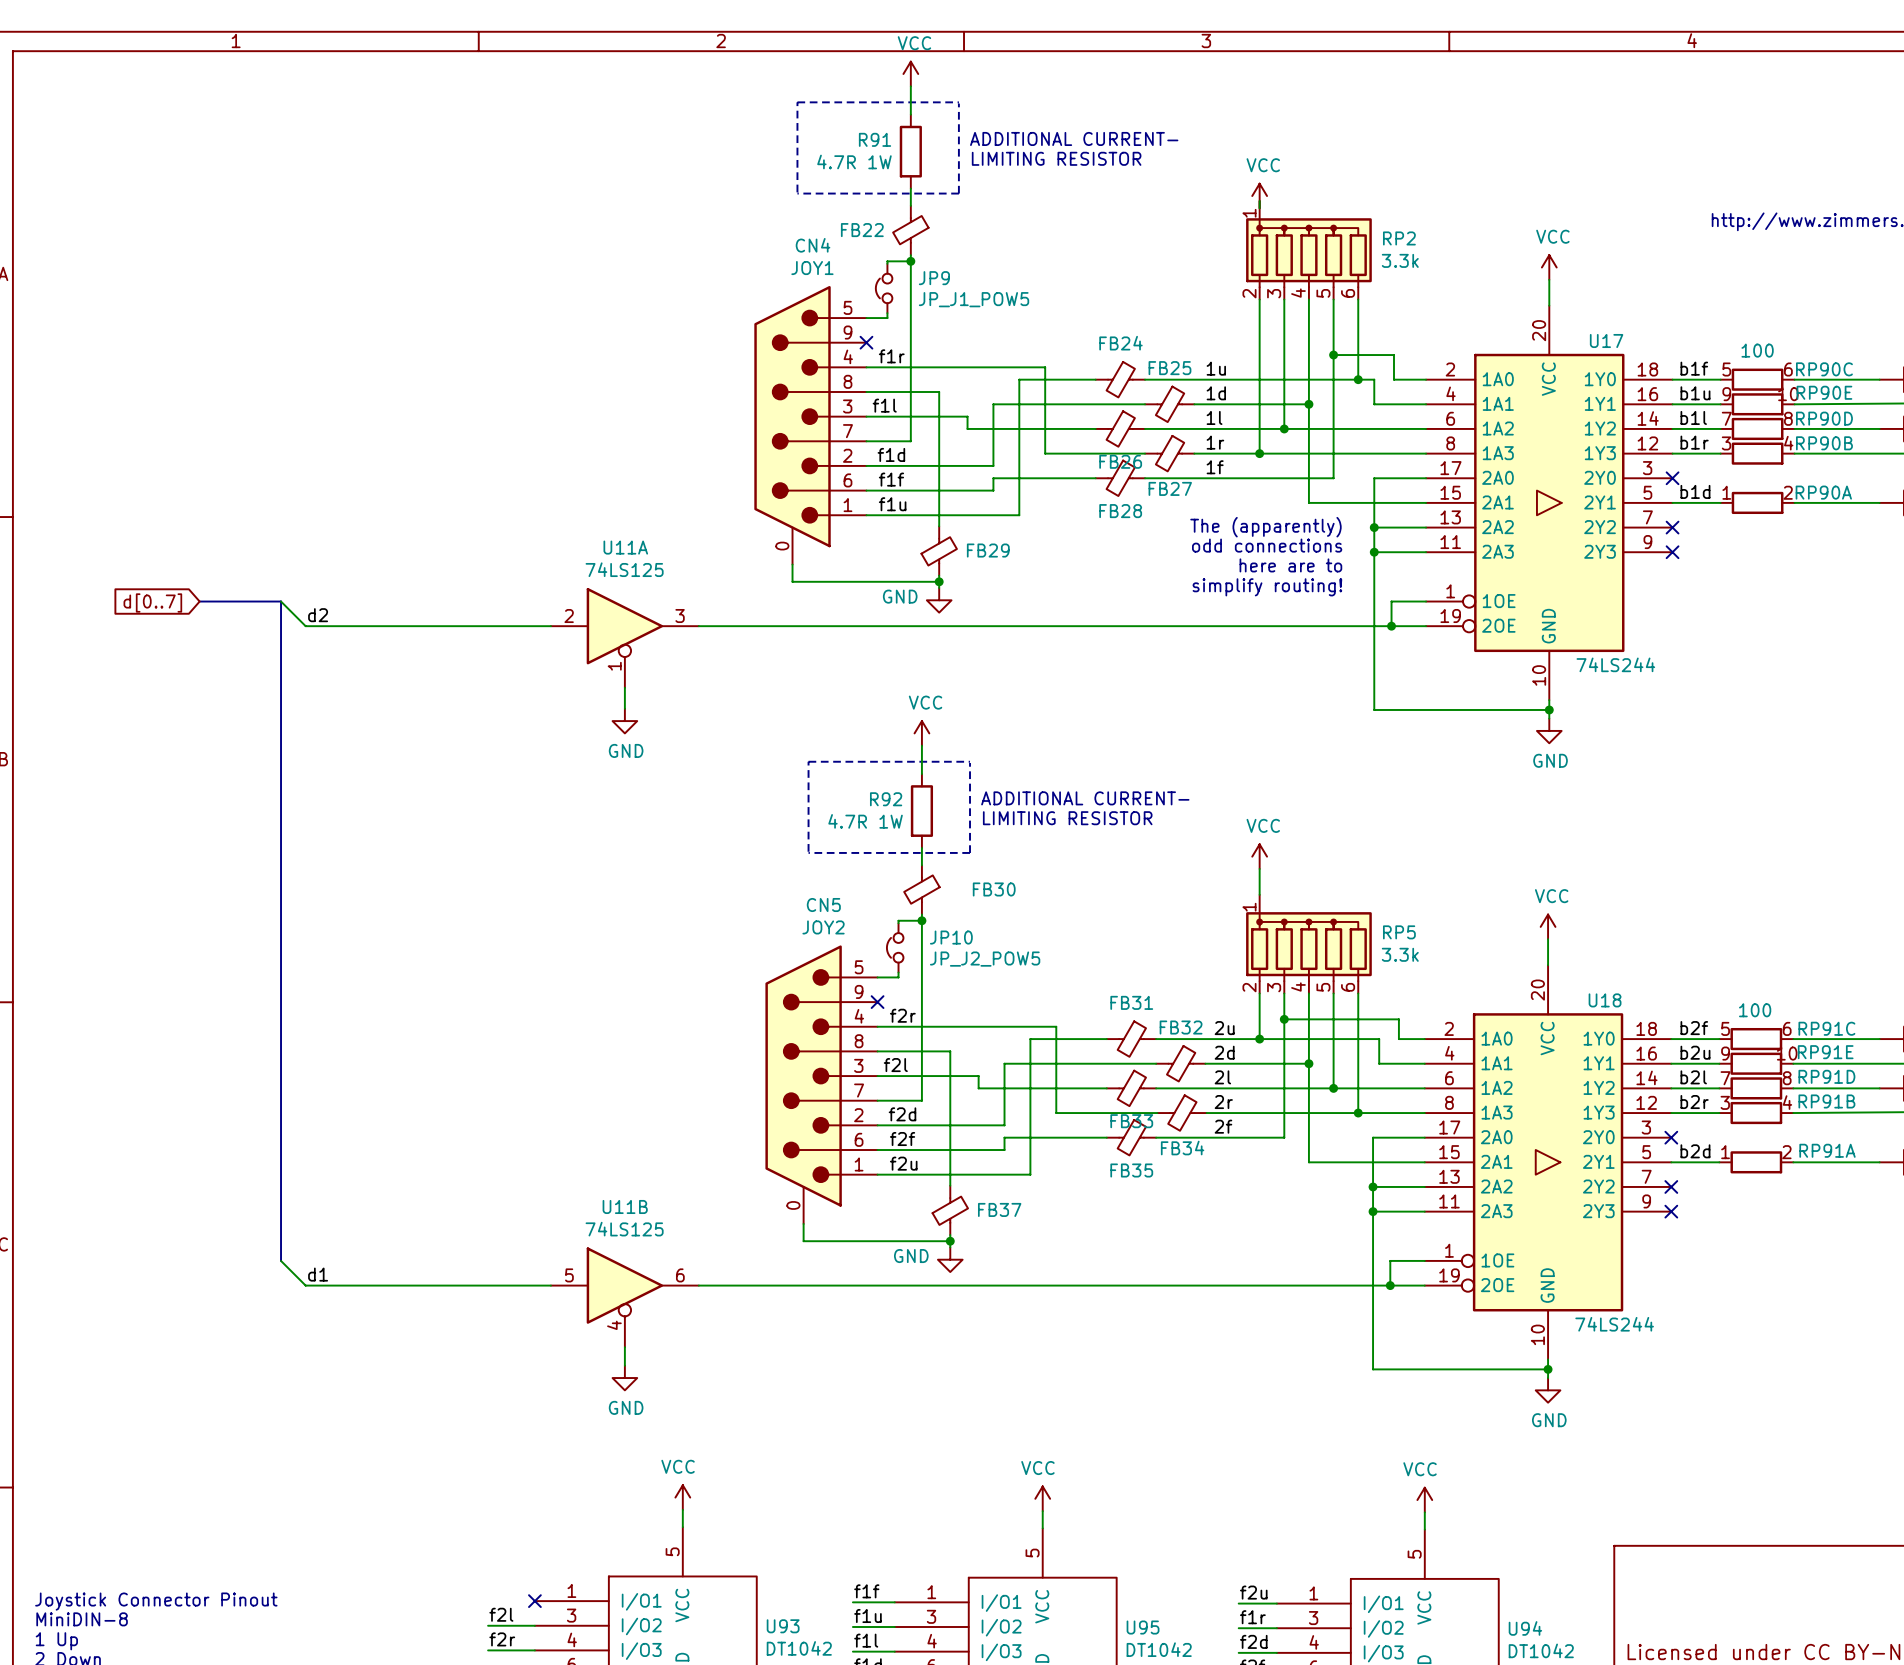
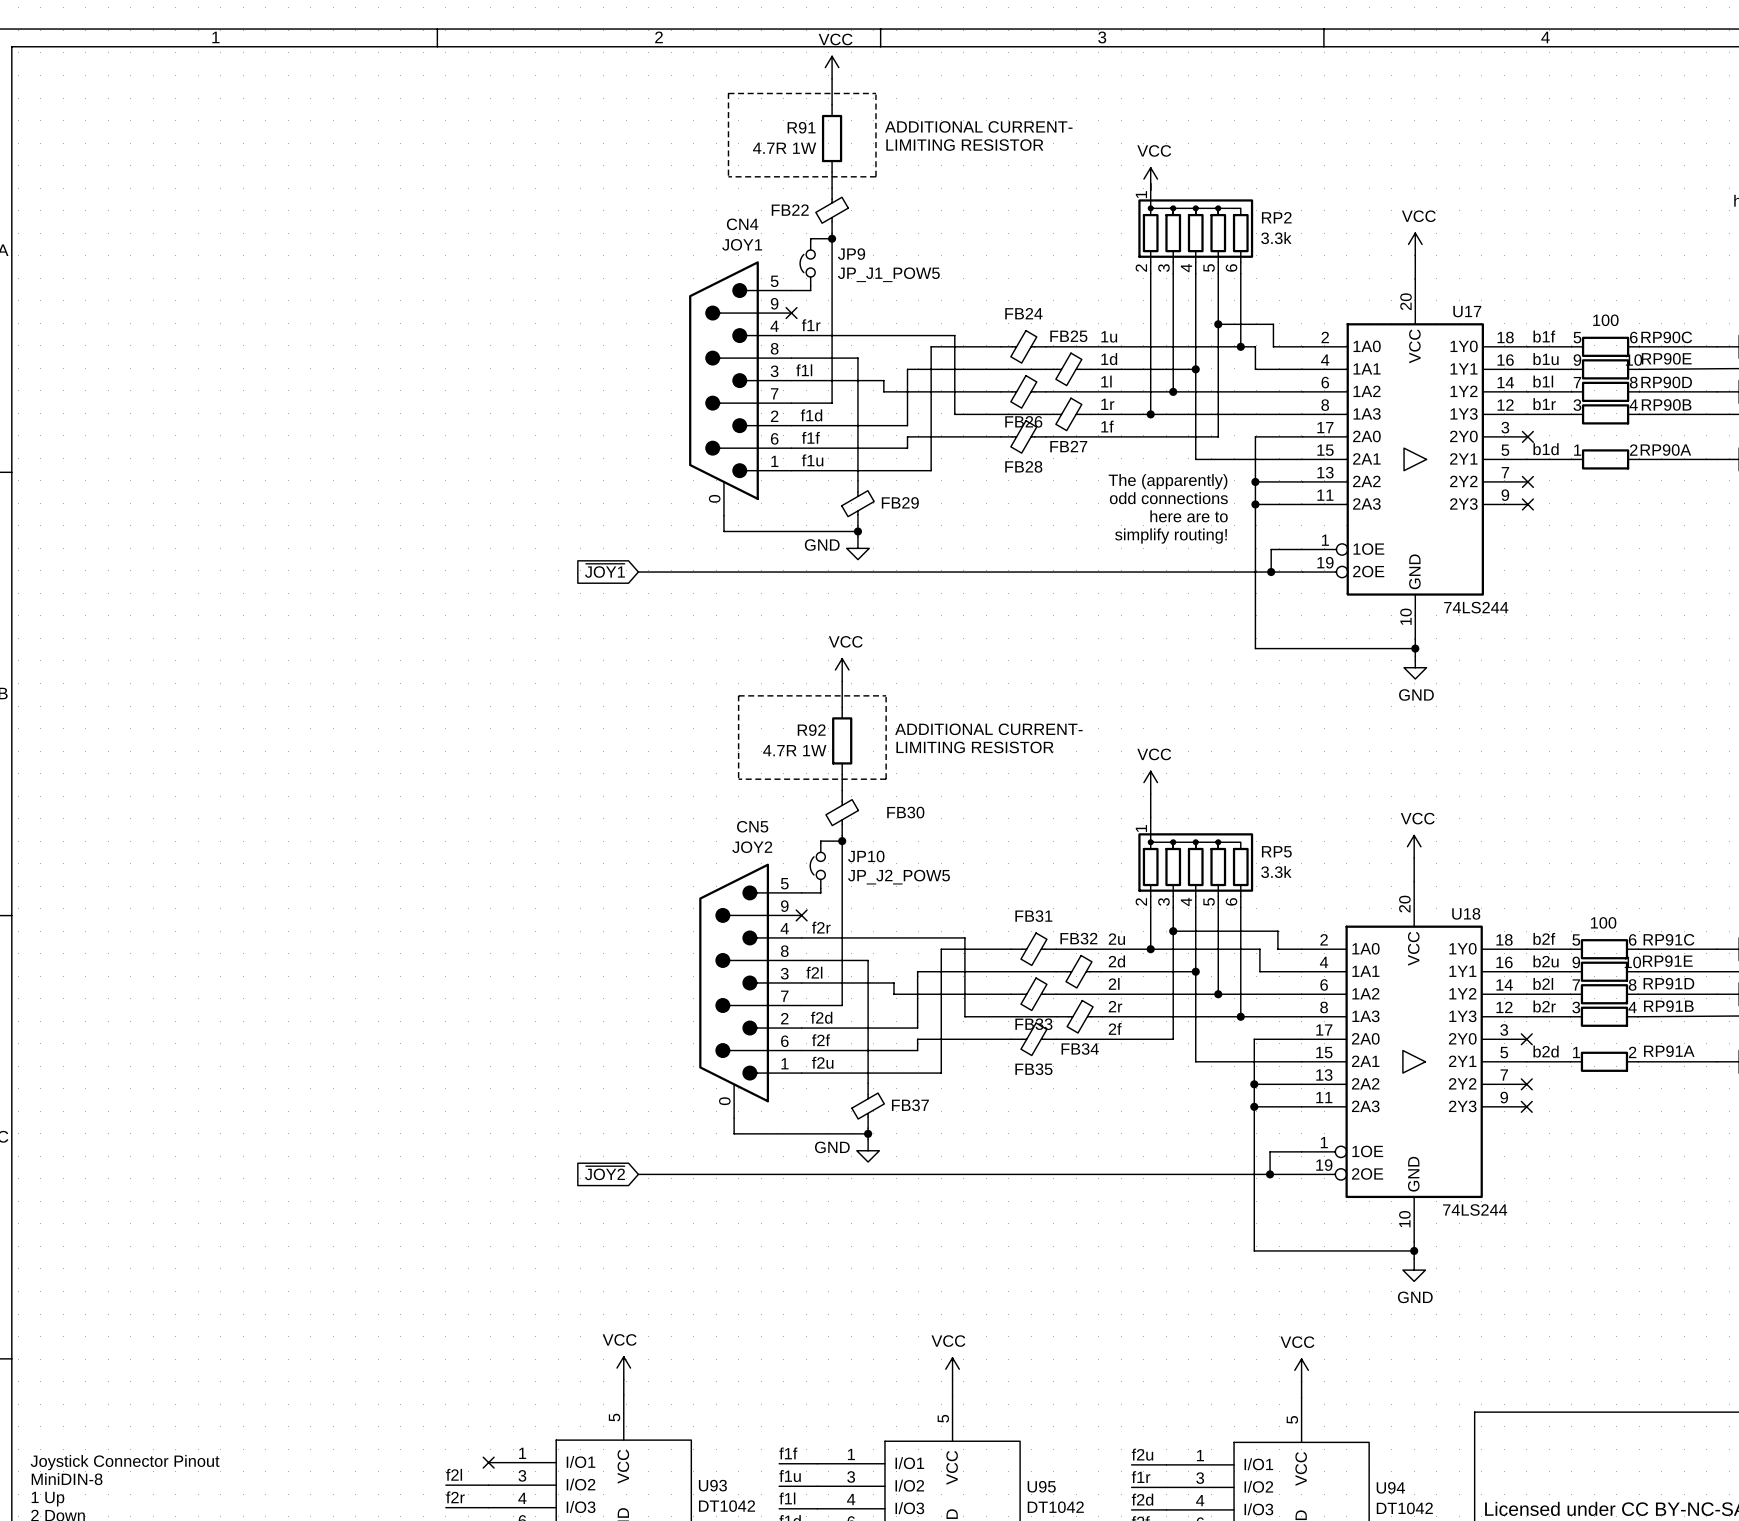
bus: (199, 601) (281, 601) (281, 1260) -> none
wire: (281, 601) (305, 626) (550, 626) -> none
global label: d[0..7] (152, 602) -> none
label: d2 (318, 615) -> none
global label: none -> ~{JOY1} (605, 570)
U11A: 74LS125 (624, 637) -> none
wire: (624, 687) (624, 708) -> none
power symbol: GND (624, 721) -> none
wire: (281, 1260) (305, 1285) (550, 1285) -> none
label: d1 (318, 1274) -> none
global label: none -> ~{JOY2} (604, 1173)
U11B: 74LS125 (624, 1297) -> none
wire: (624, 1347) (624, 1365) -> none
power symbol: GND (624, 1378) -> none

